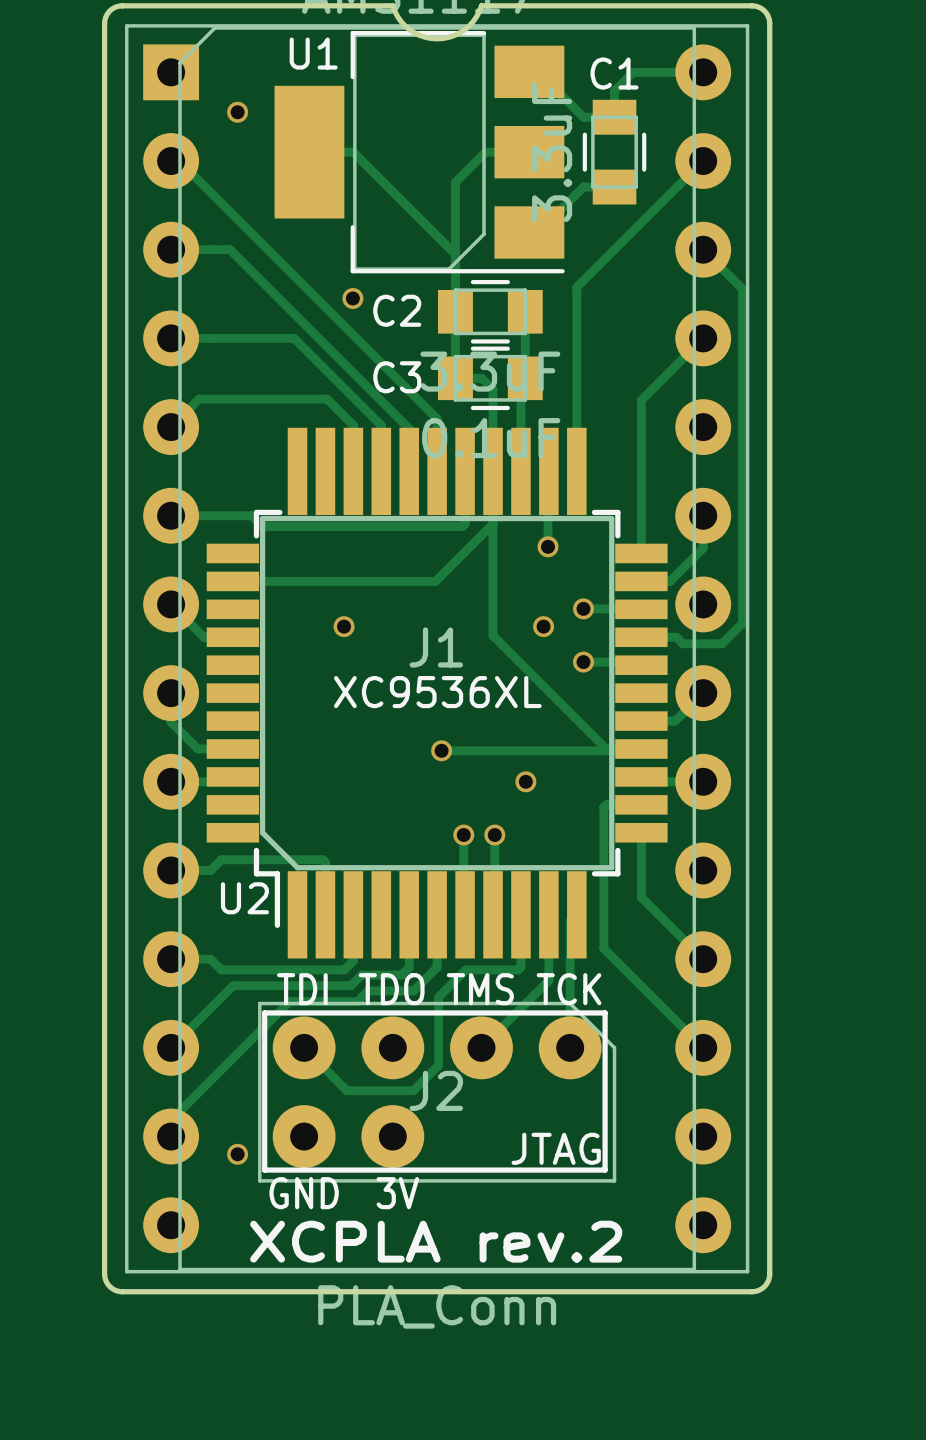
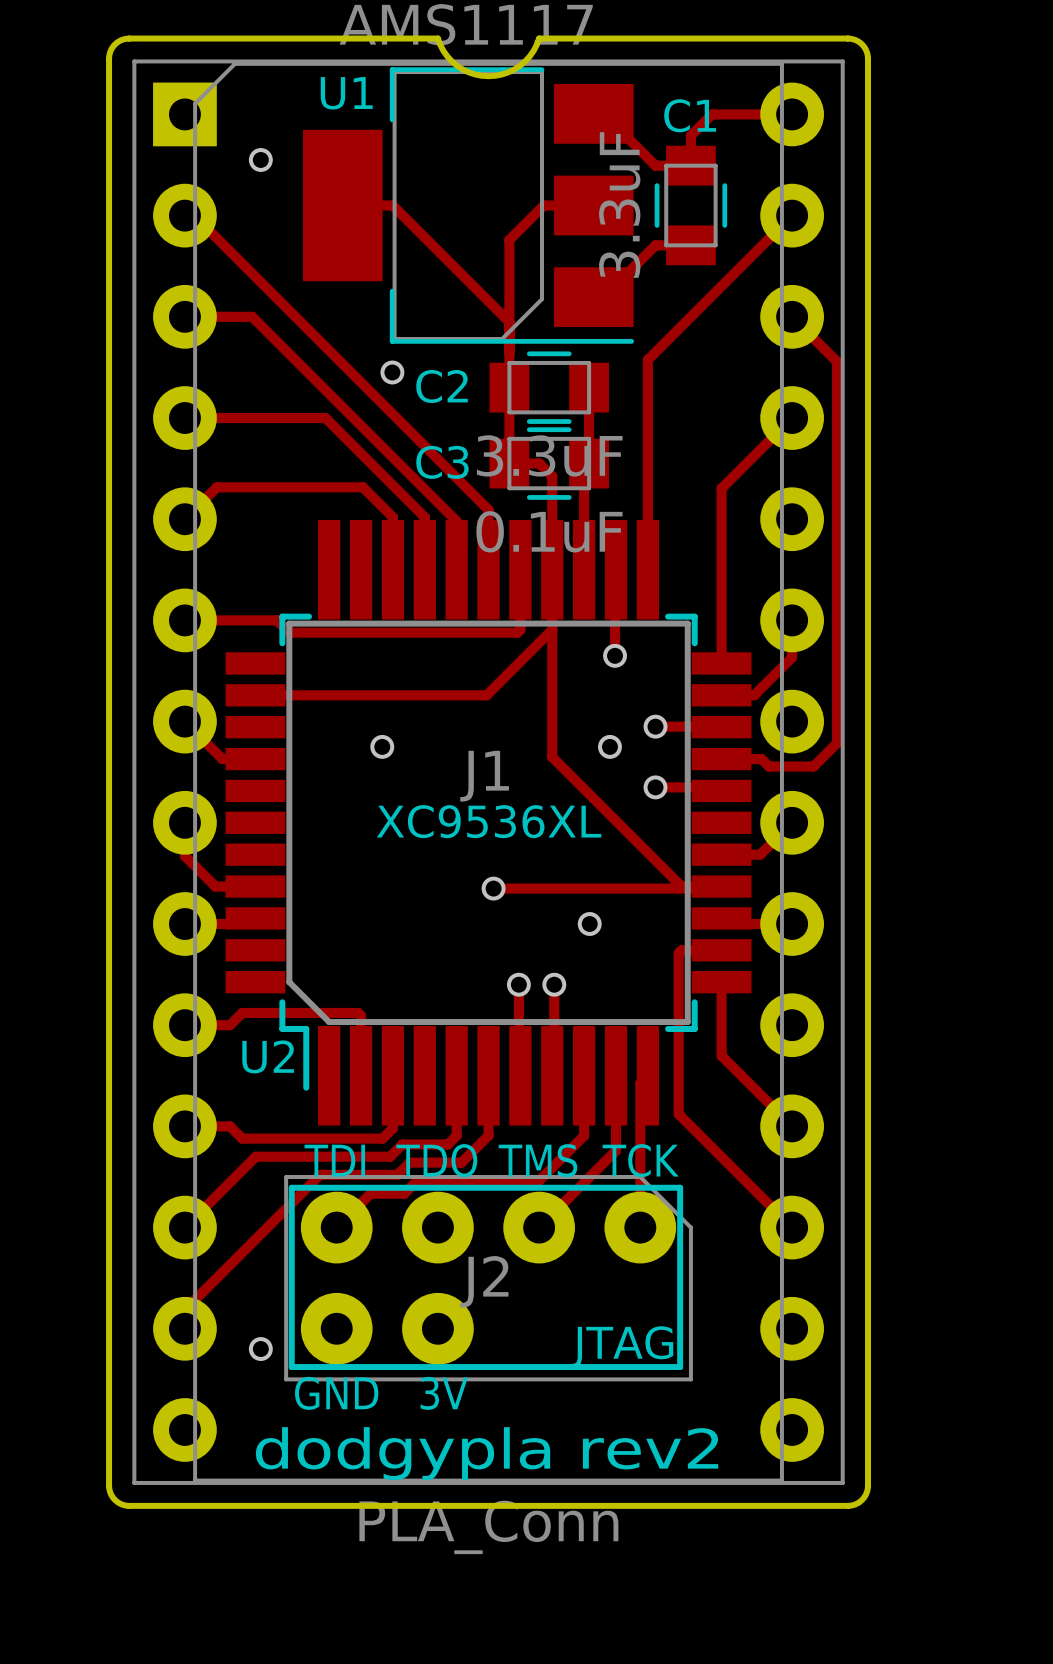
track: (518, 969) (465, 969) (438, 997) (438, 1065) (413, 1090) (346, 1090) (304, 1047) -> (581, 1138) (539, 1180) (417, 1180) (404, 1193) (370, 1193) (336, 1227)
text: XCPLA rev.2 (436, 1241) -> dodgypla rev2 (487, 1453)

